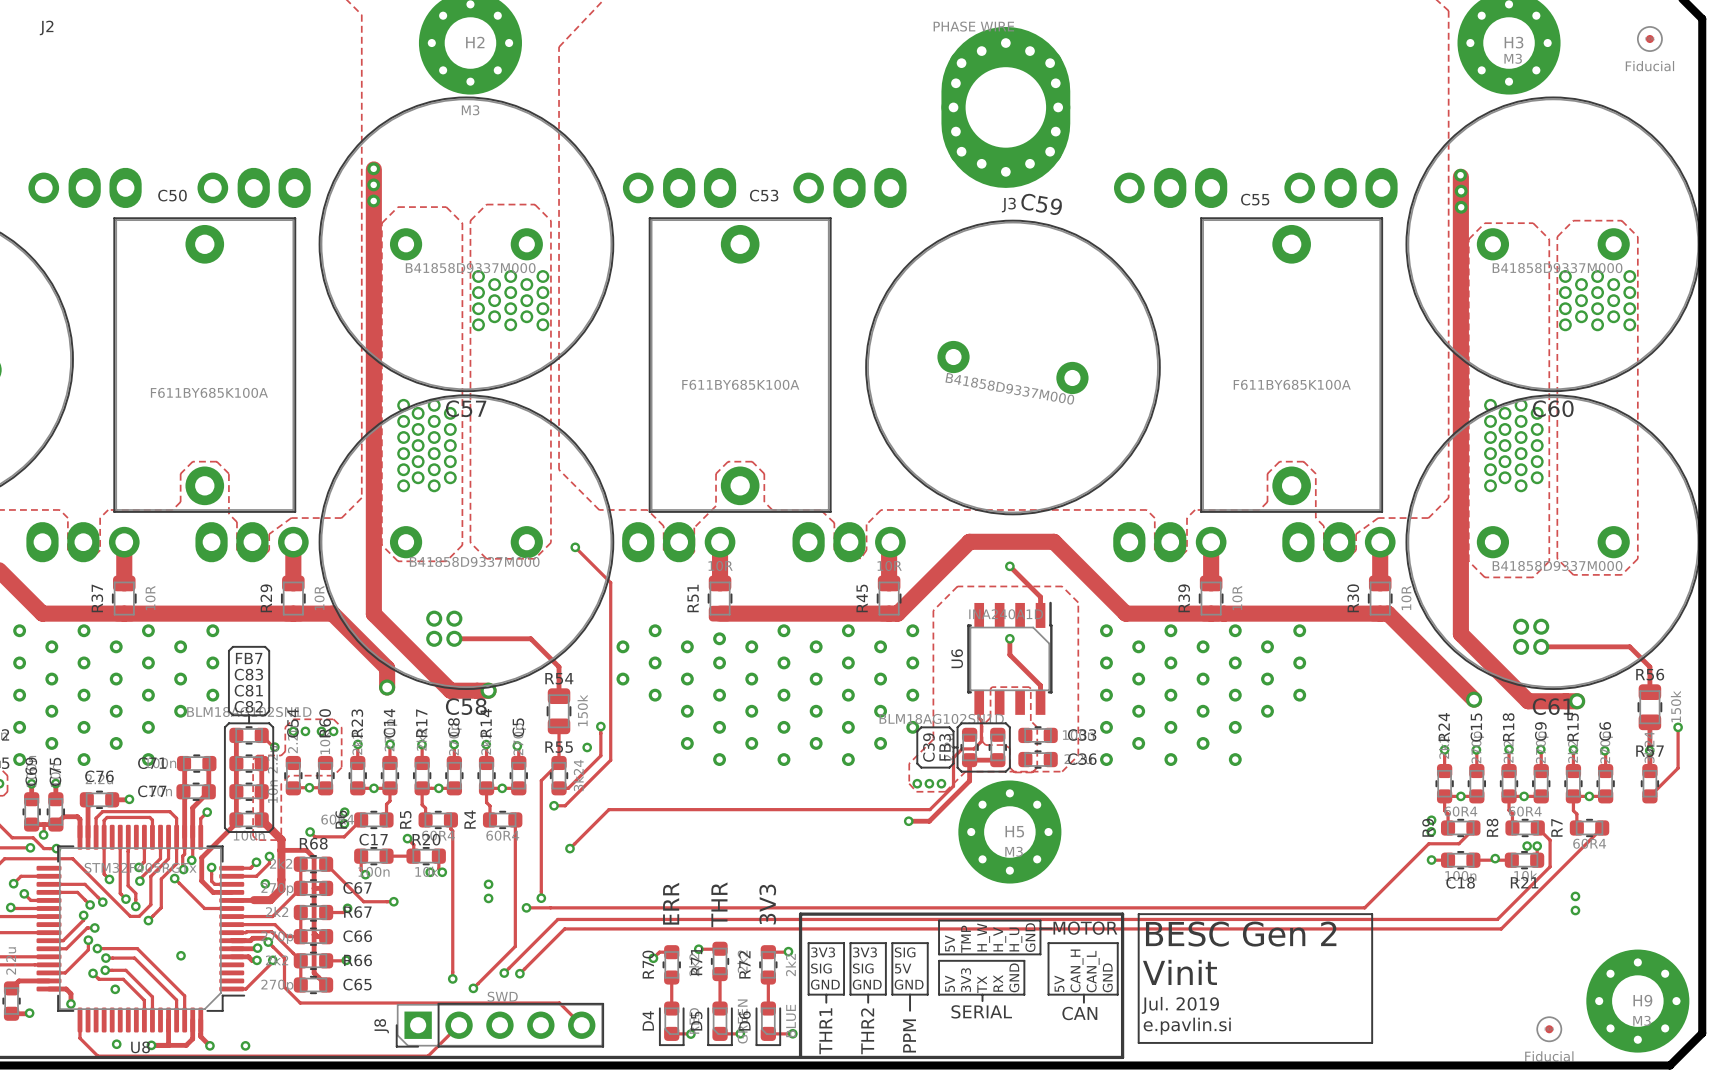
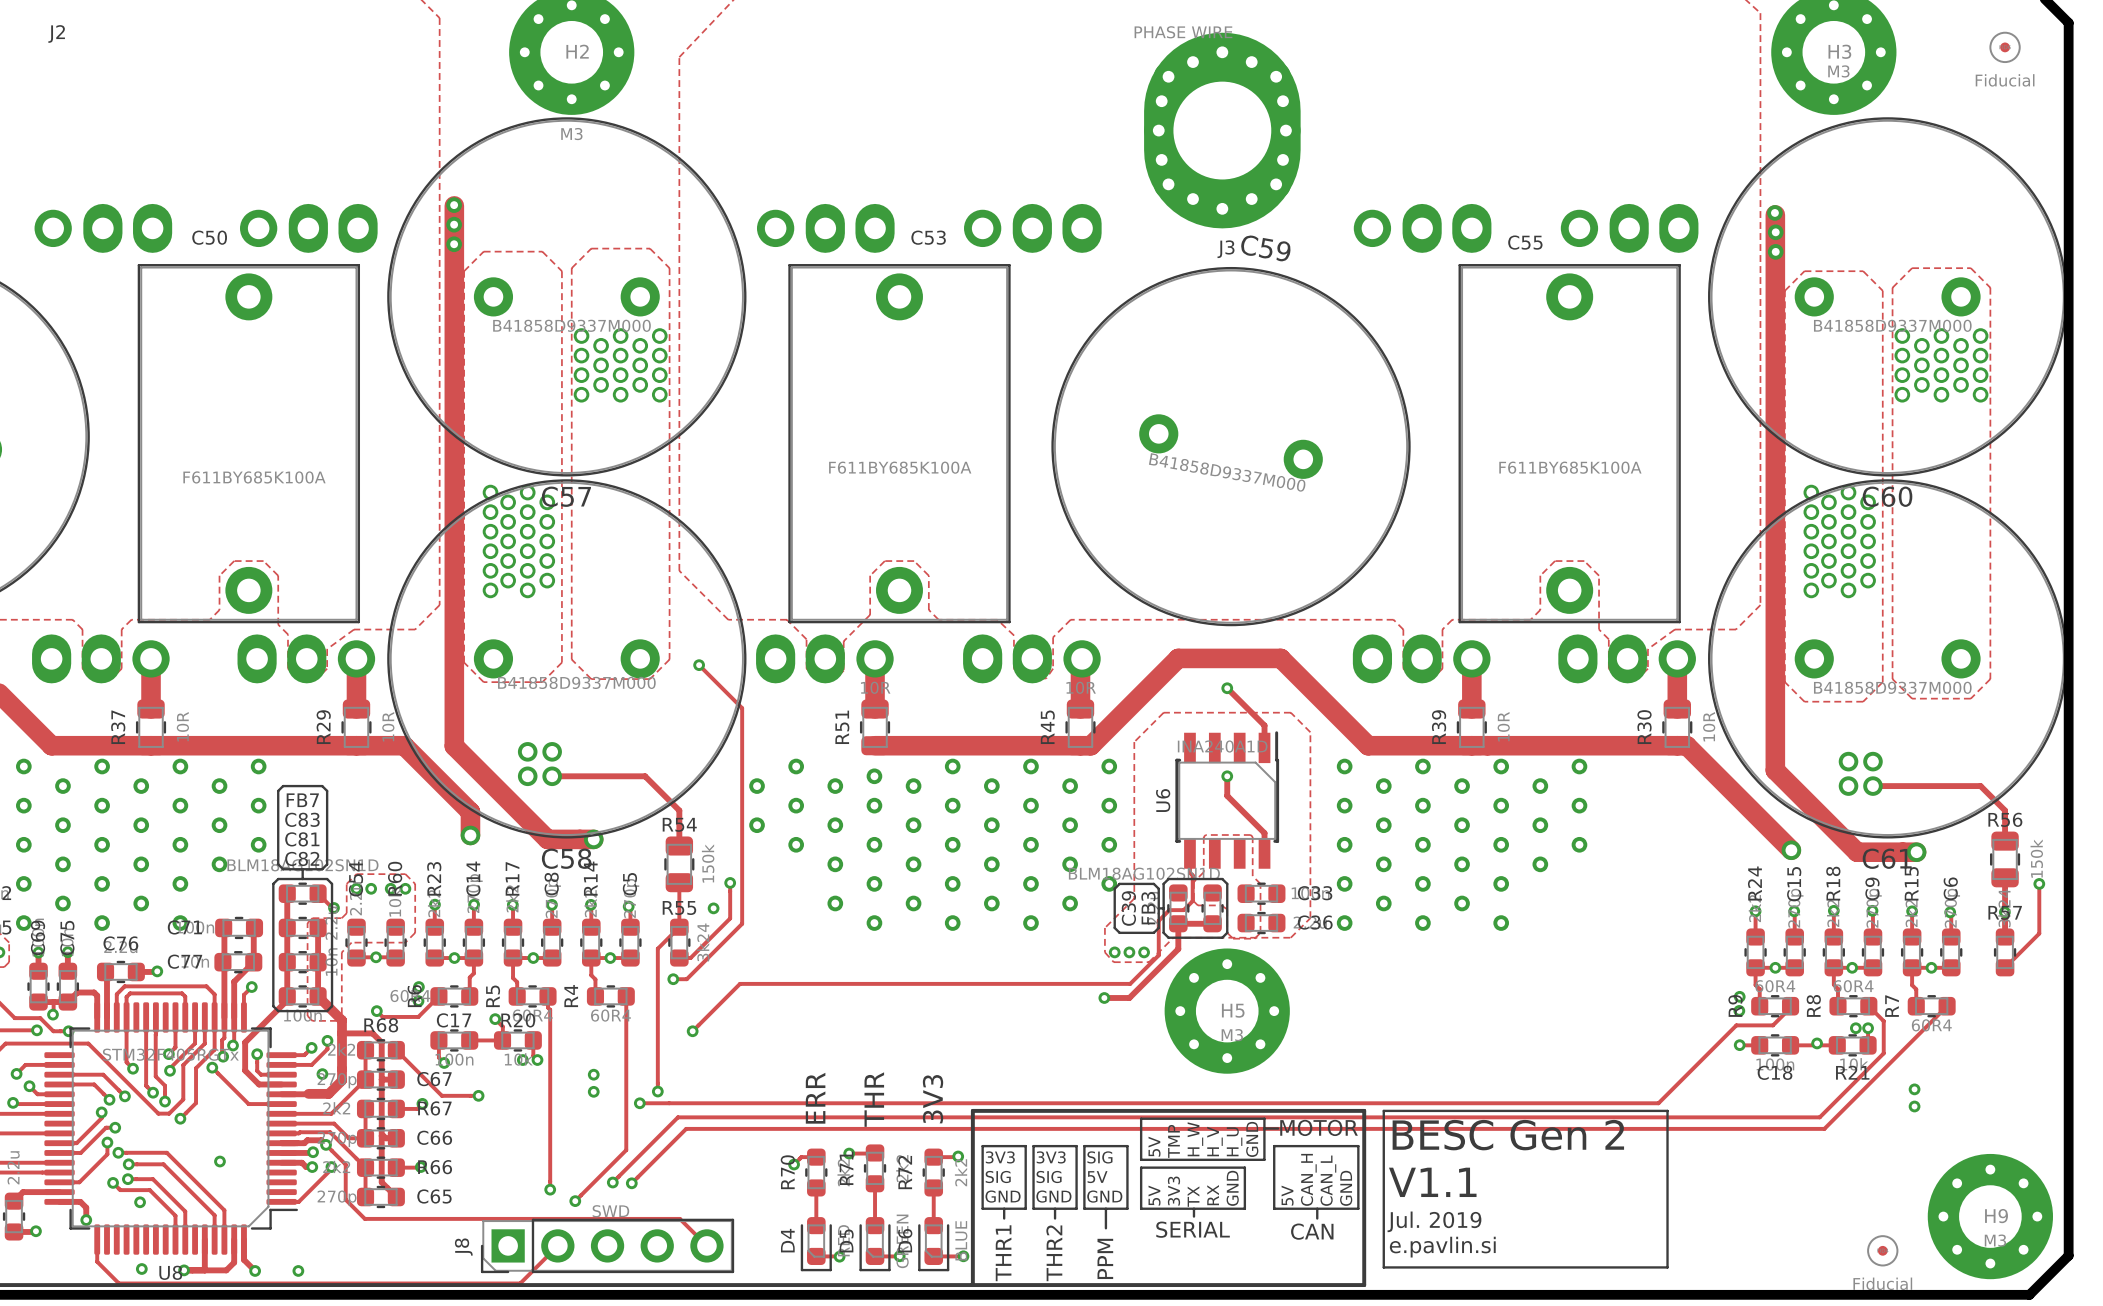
text: Vinit (1179, 972) -> V1.1 (1432, 1182)

